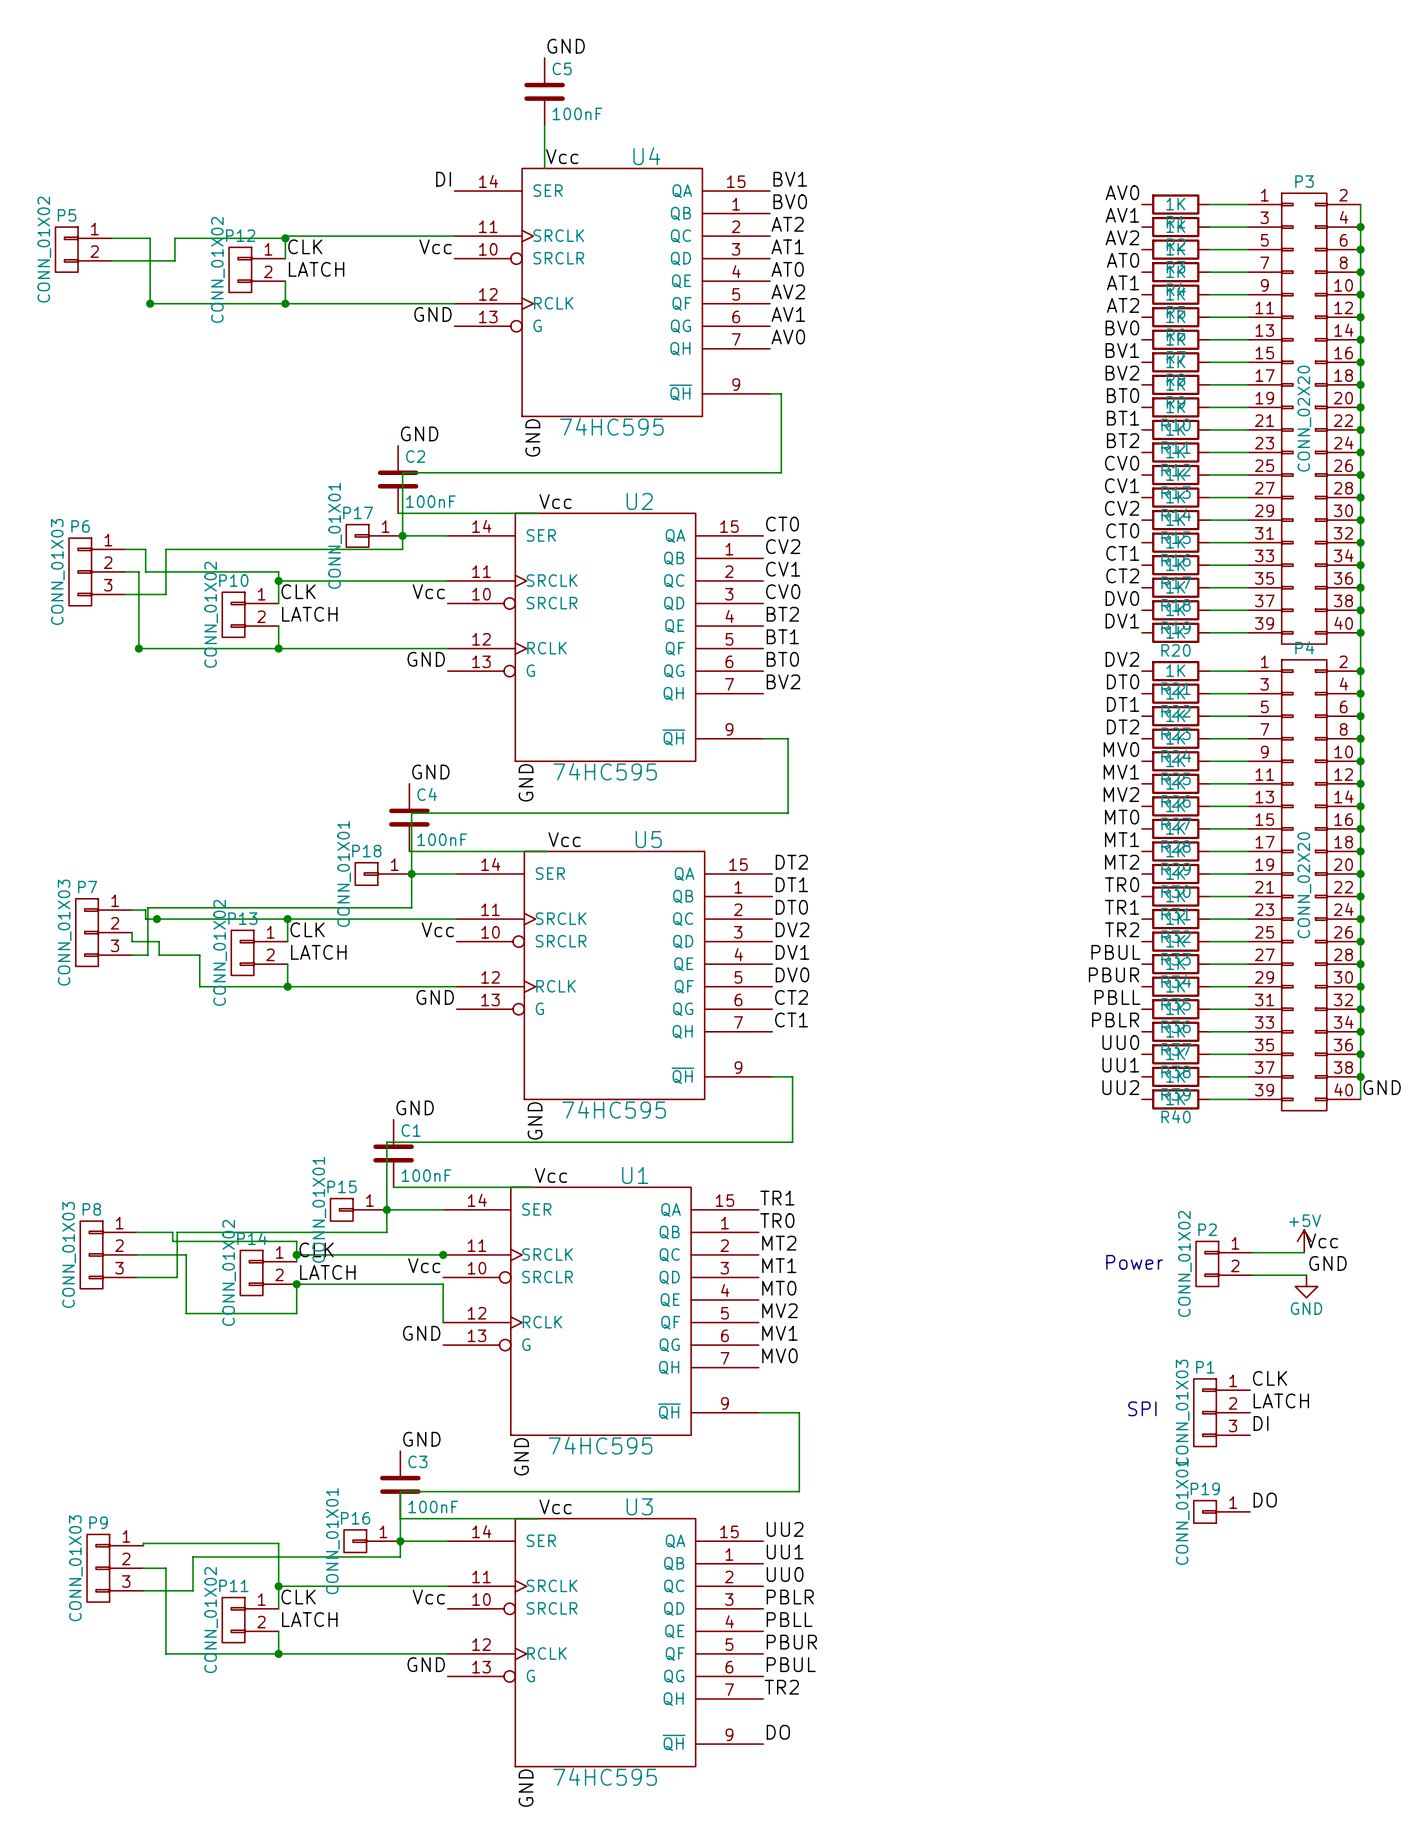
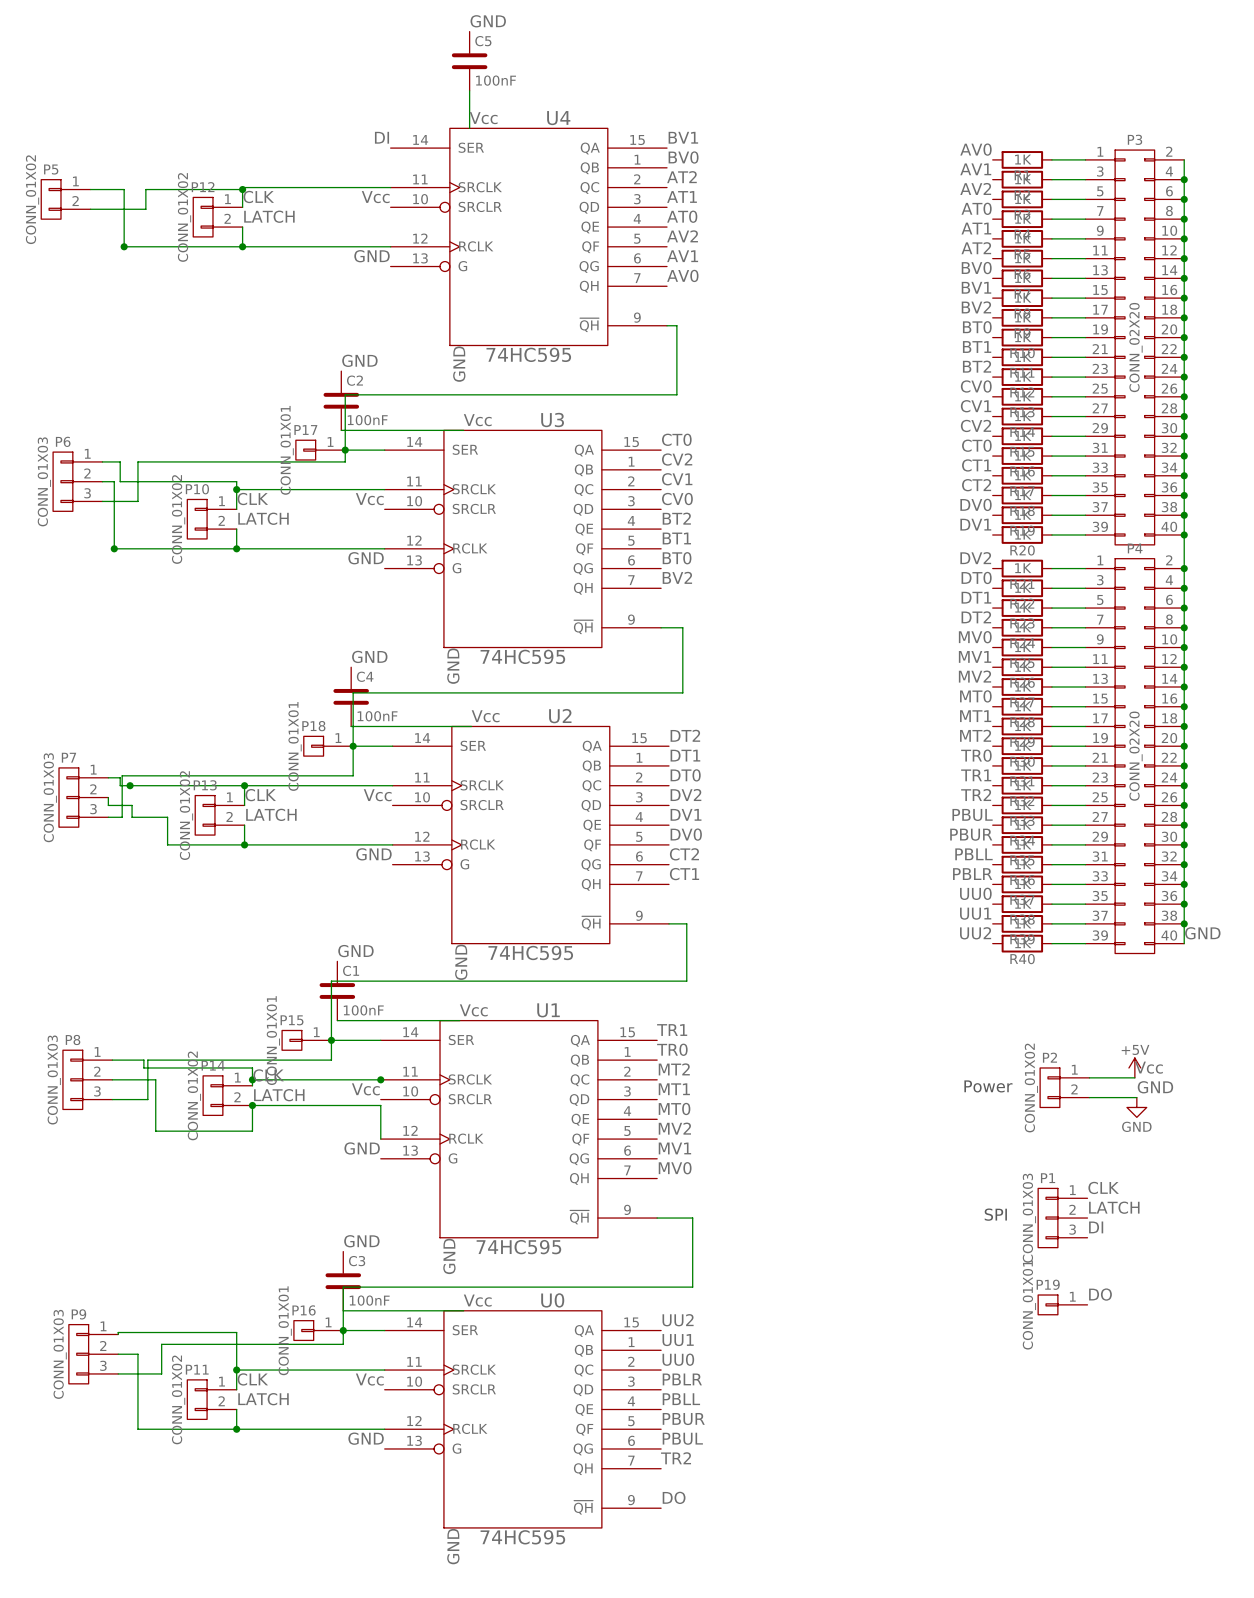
U2 name: U2 (639, 501) -> U3 (552, 419)
U5 name: U5 (648, 839) -> U2 (560, 716)
U3 name: U3 (639, 1506) -> U0 (552, 1300)

